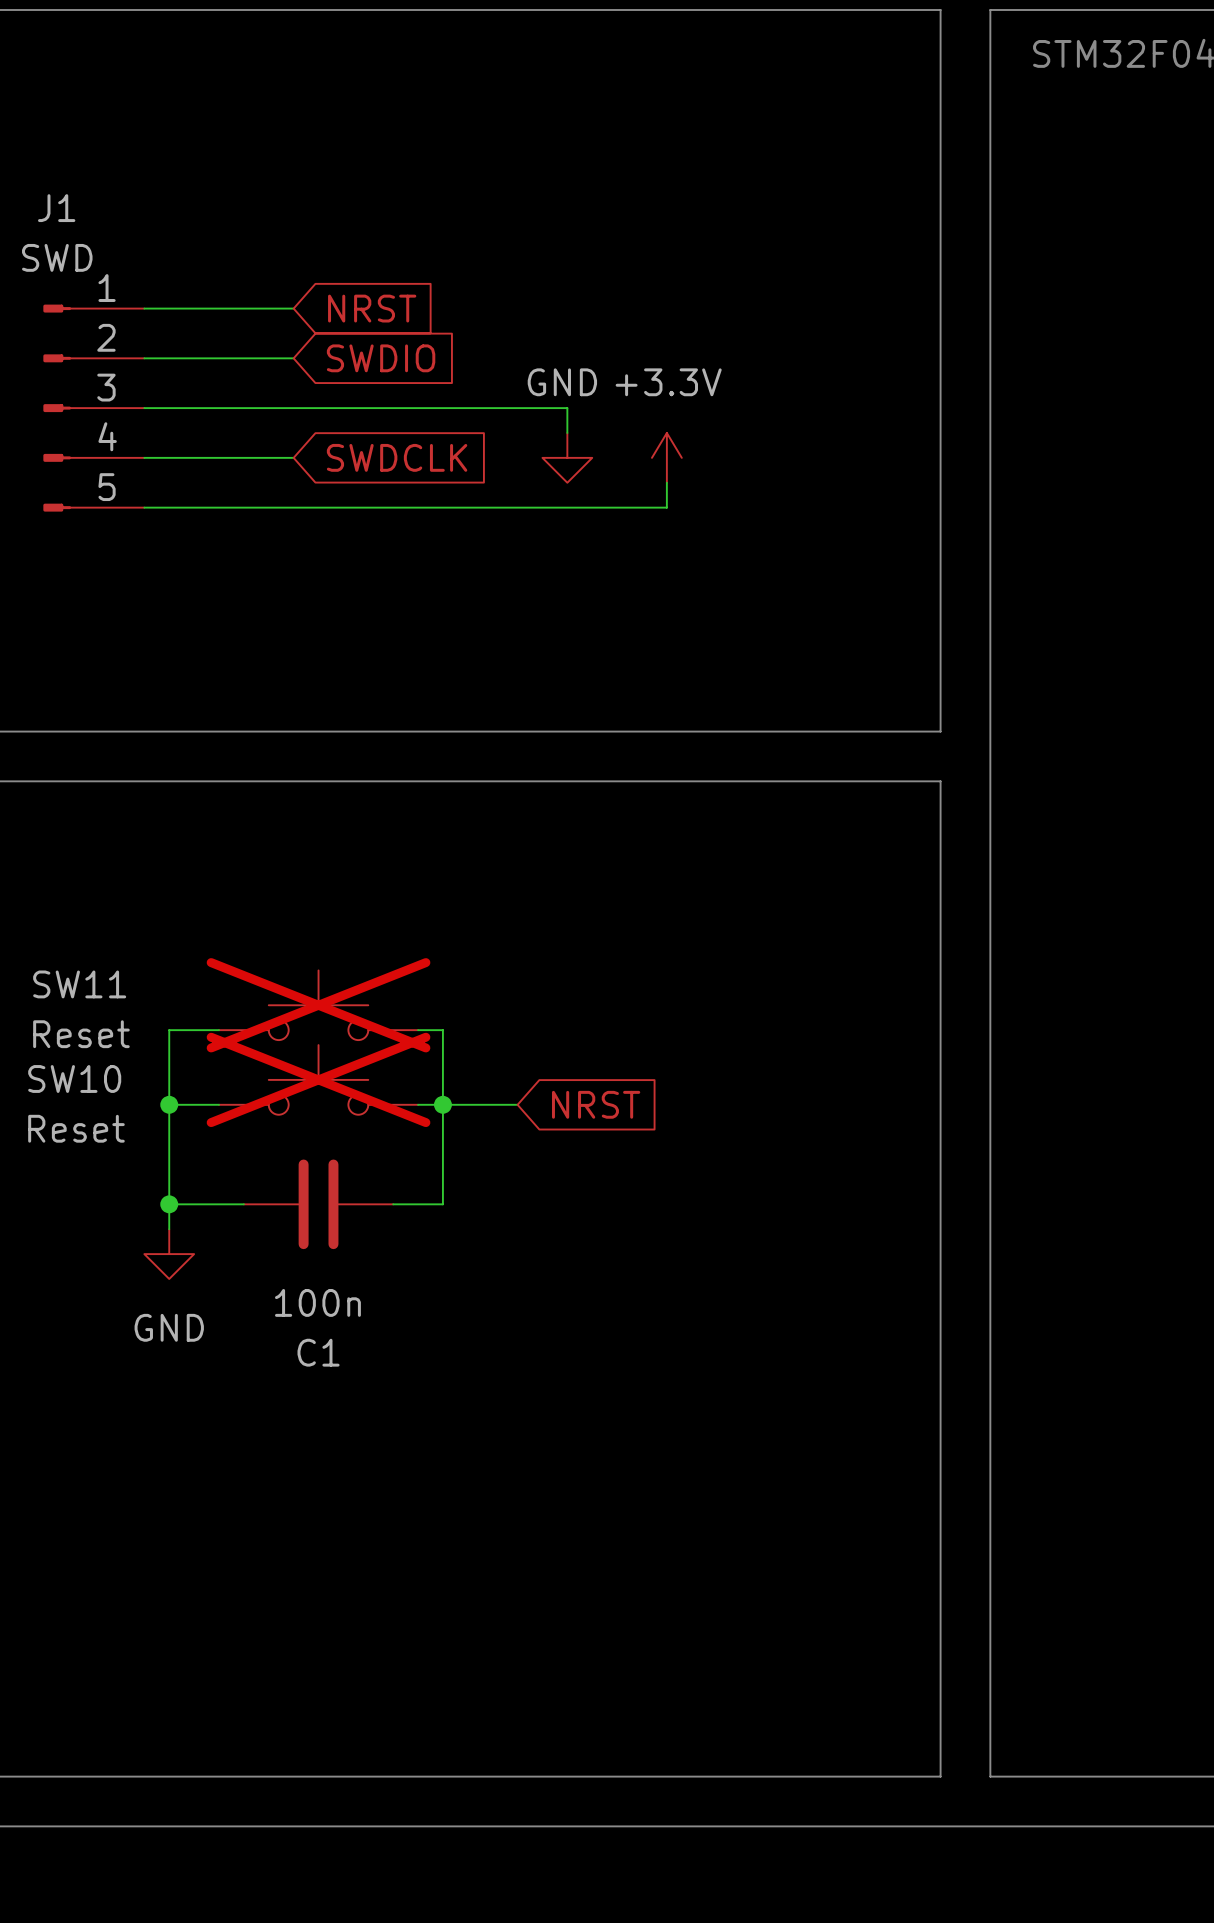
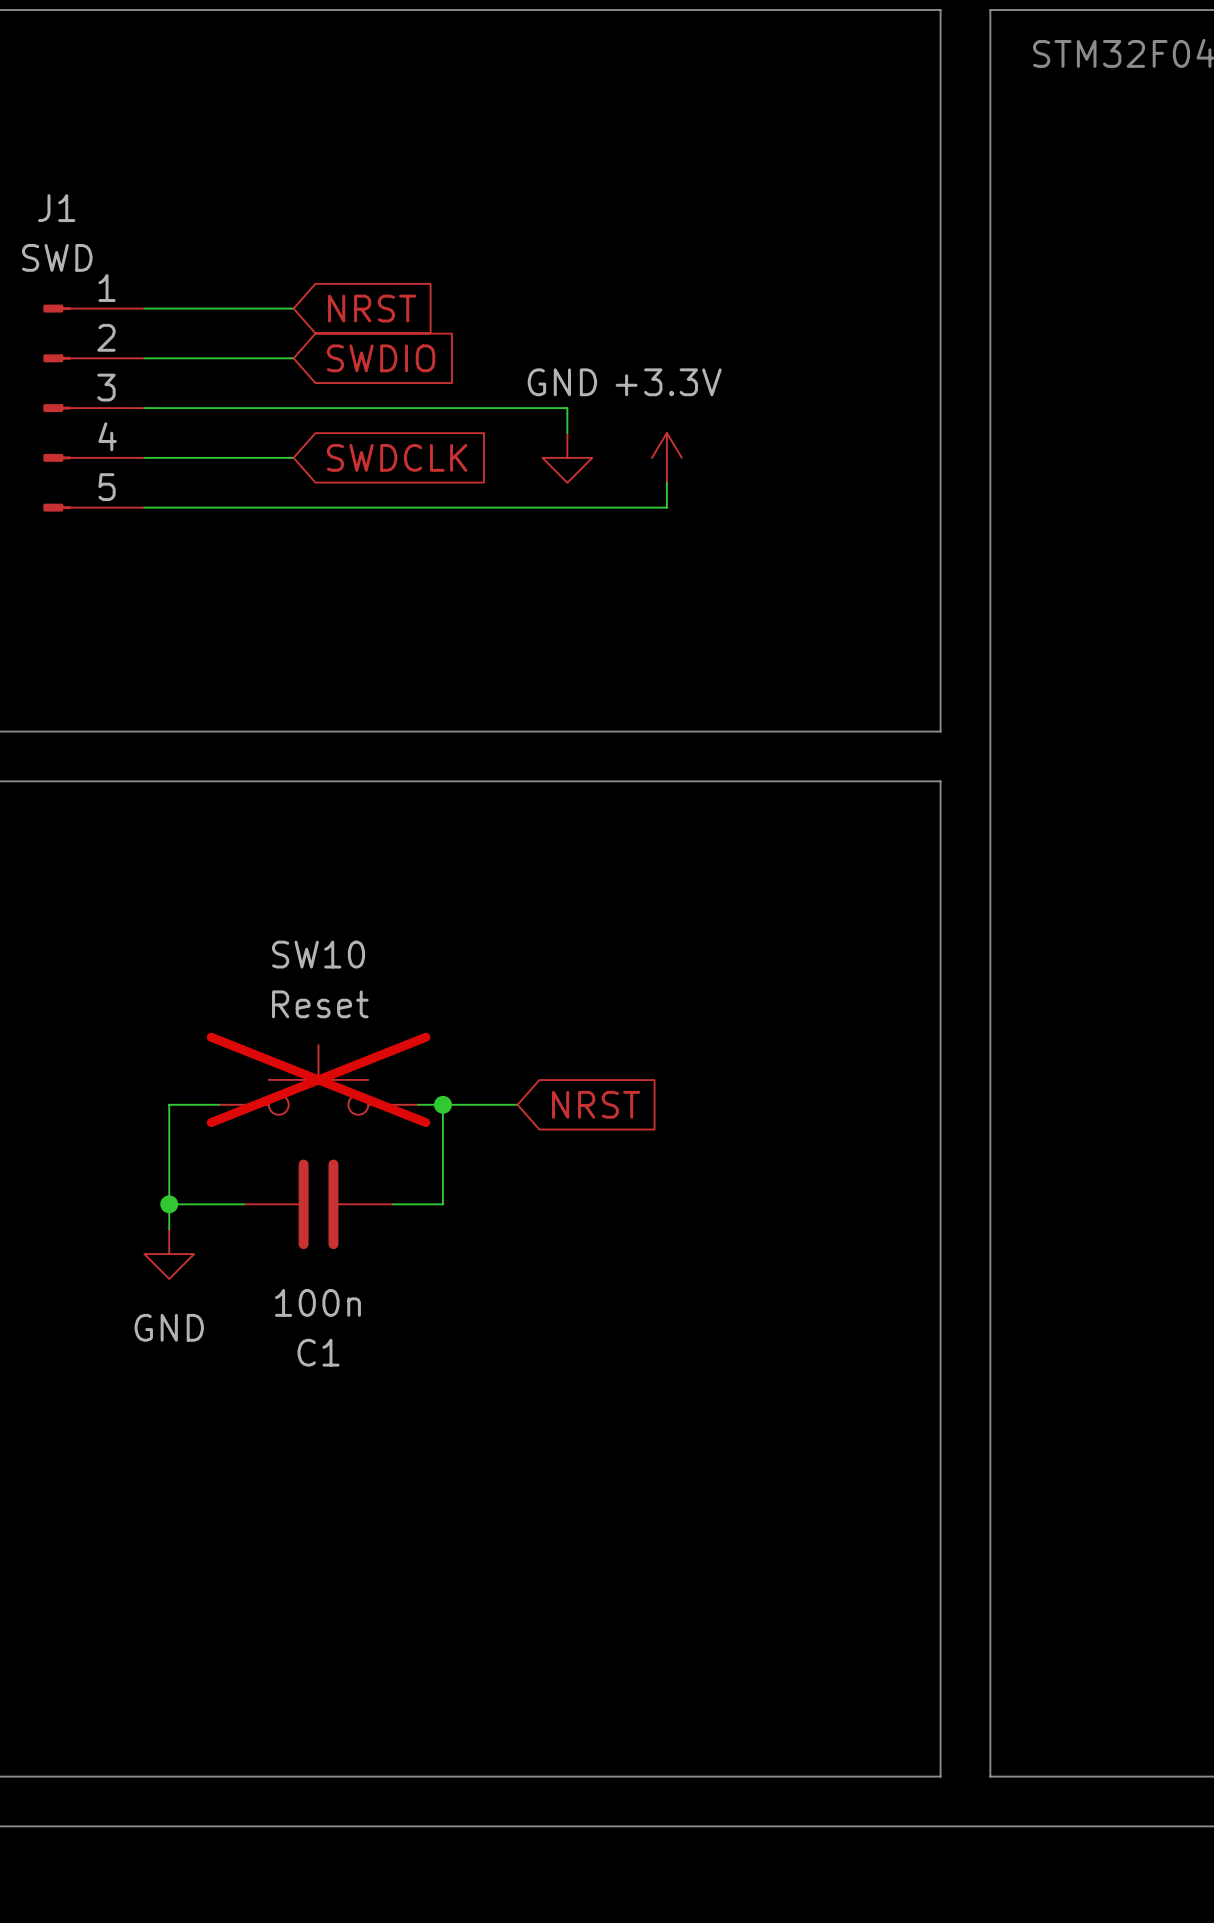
SW11: Reset (318, 1005) -> none
wire: (219, 1030) (169, 1030) (169, 1104) -> none
wire: (418, 1030) (442, 1030) (442, 1104) -> none
SW10 name position: SW10 (74, 1078) -> SW10 (318, 954)
junction: (169, 1104) -> none
SW10 value position: Reset (76, 1128) -> Reset (320, 1004)

